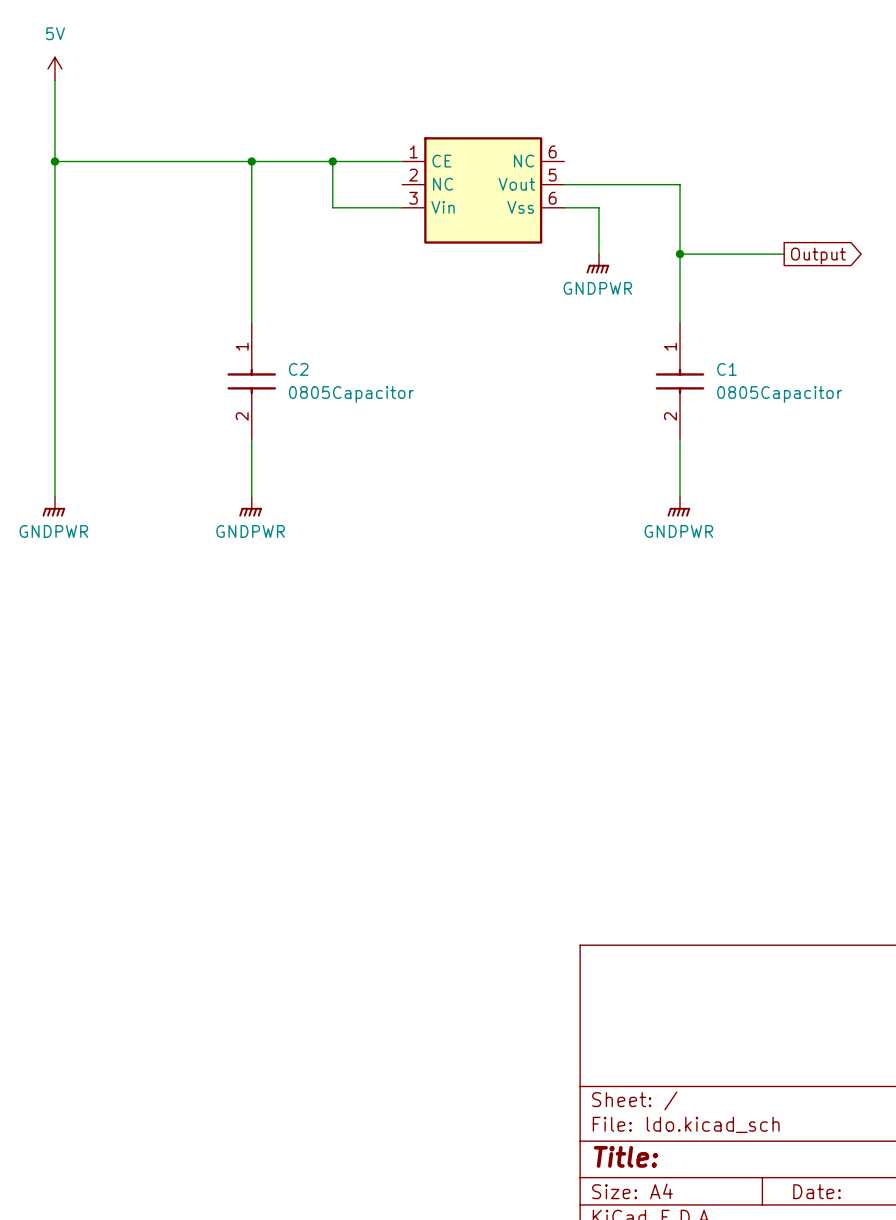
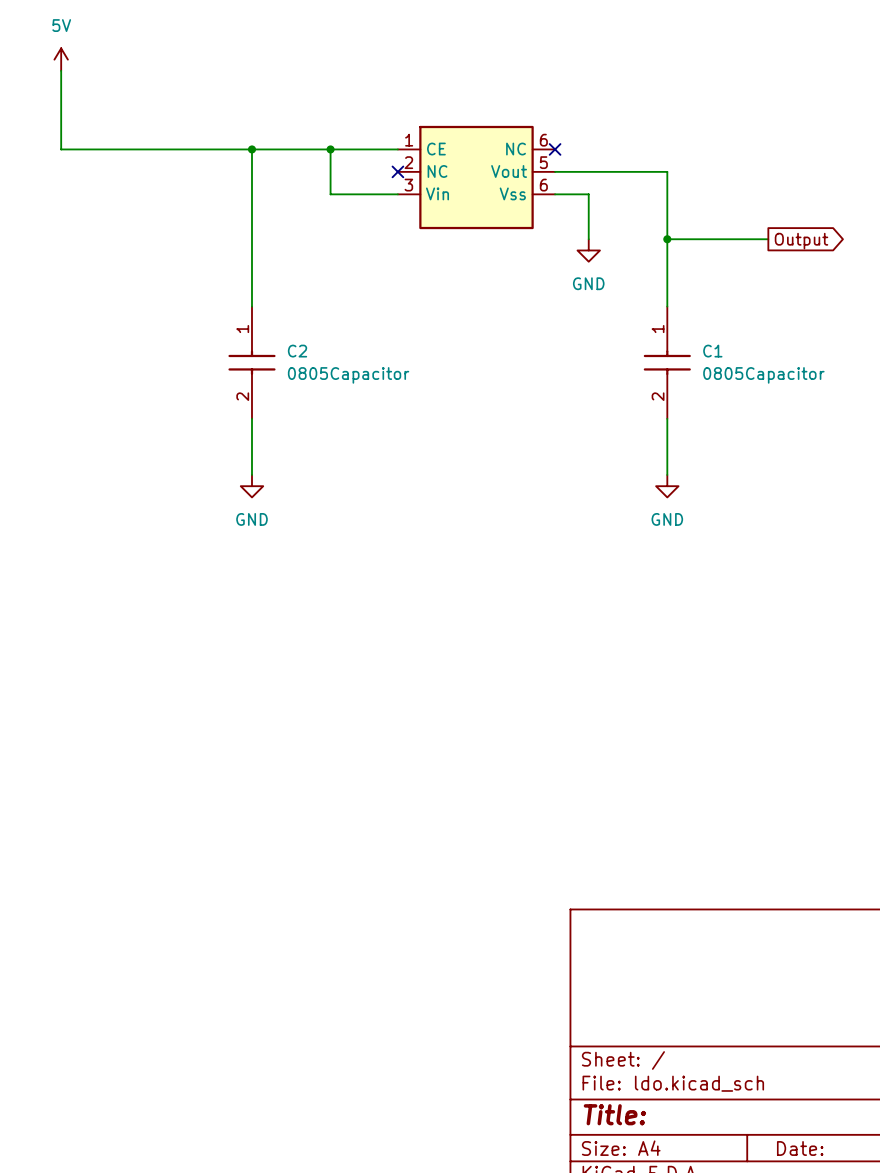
wire: (54, 161) (54, 497) -> none
junction: (54, 161) -> none
no-connect mark: none -> (555, 149)
no-connect mark: none -> (397, 171)
power symbol: GNDPWR (597, 263) -> GND (588, 250)
power symbol: GNDPWR (53, 506) -> none
power symbol: GNDPWR (250, 506) -> GND (251, 486)
power symbol: GNDPWR (678, 506) -> GND (667, 486)

